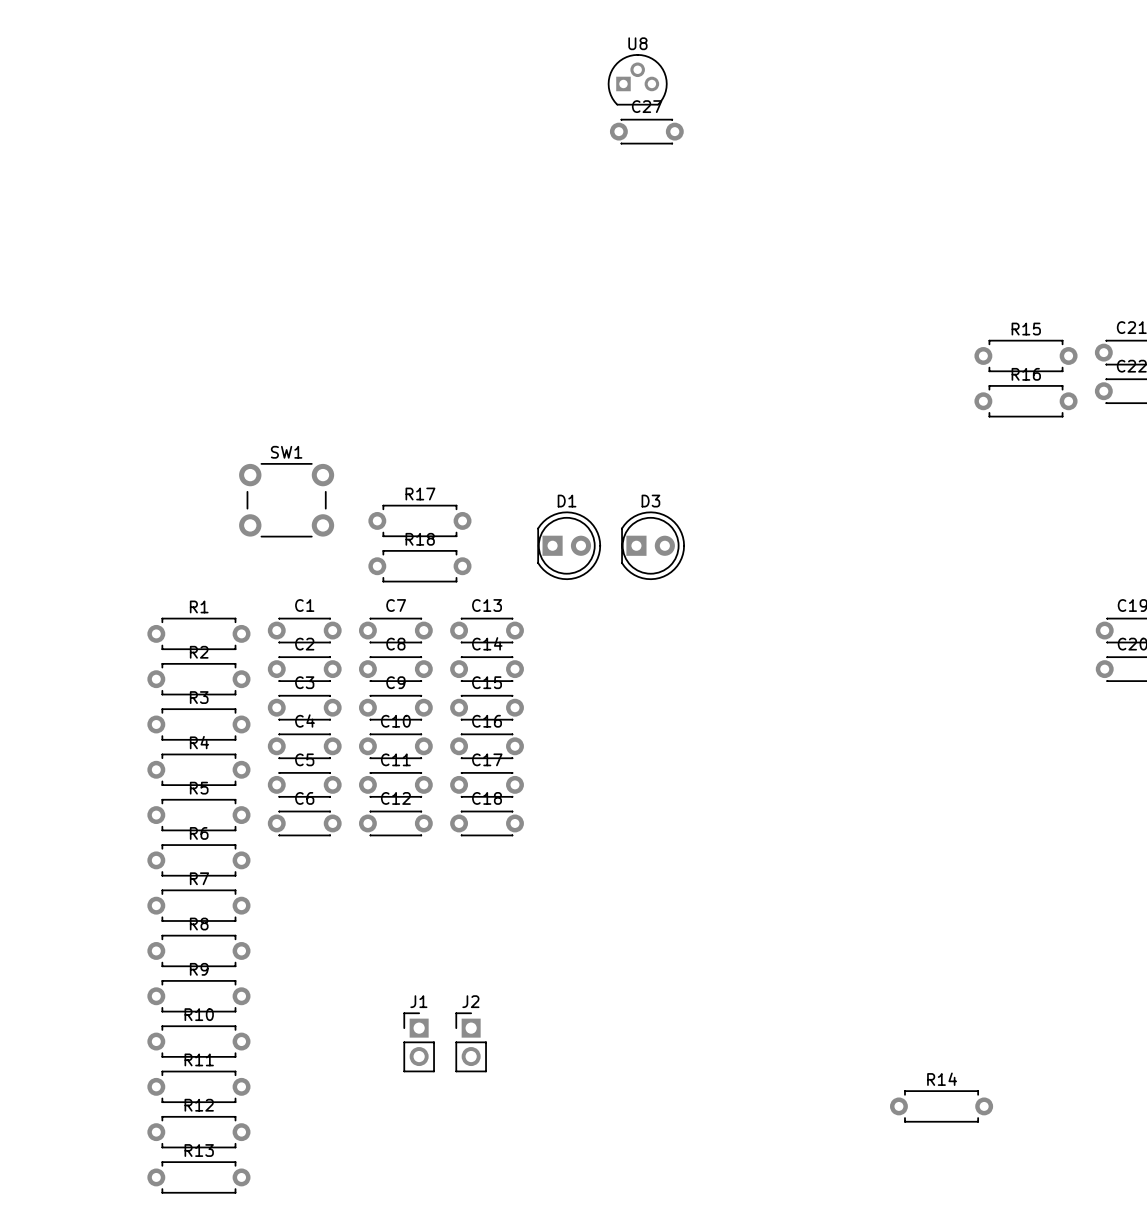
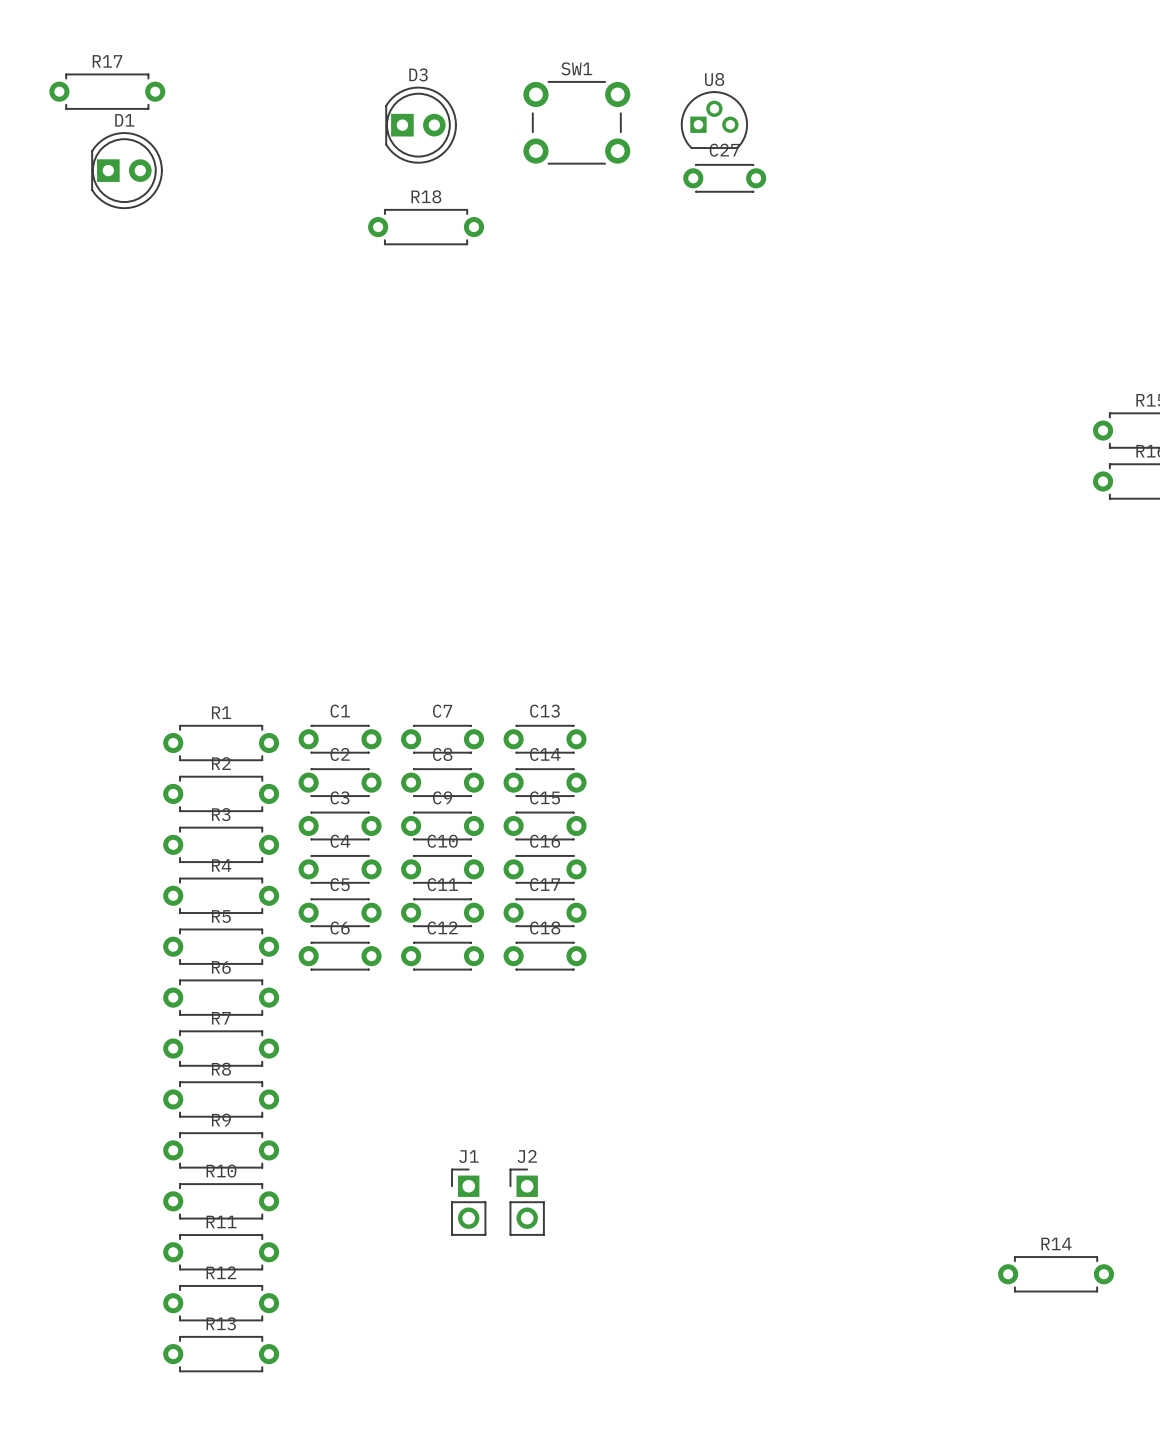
SW1 position: (286, 500) -> (576, 122)
D1 footprint: [537, 511, 601, 580] -> [91, 132, 163, 209]
R17 position: (419, 520) -> (107, 91)
D3 position: (653, 545) -> (421, 125)
R18 position: (419, 566) -> (426, 227)

